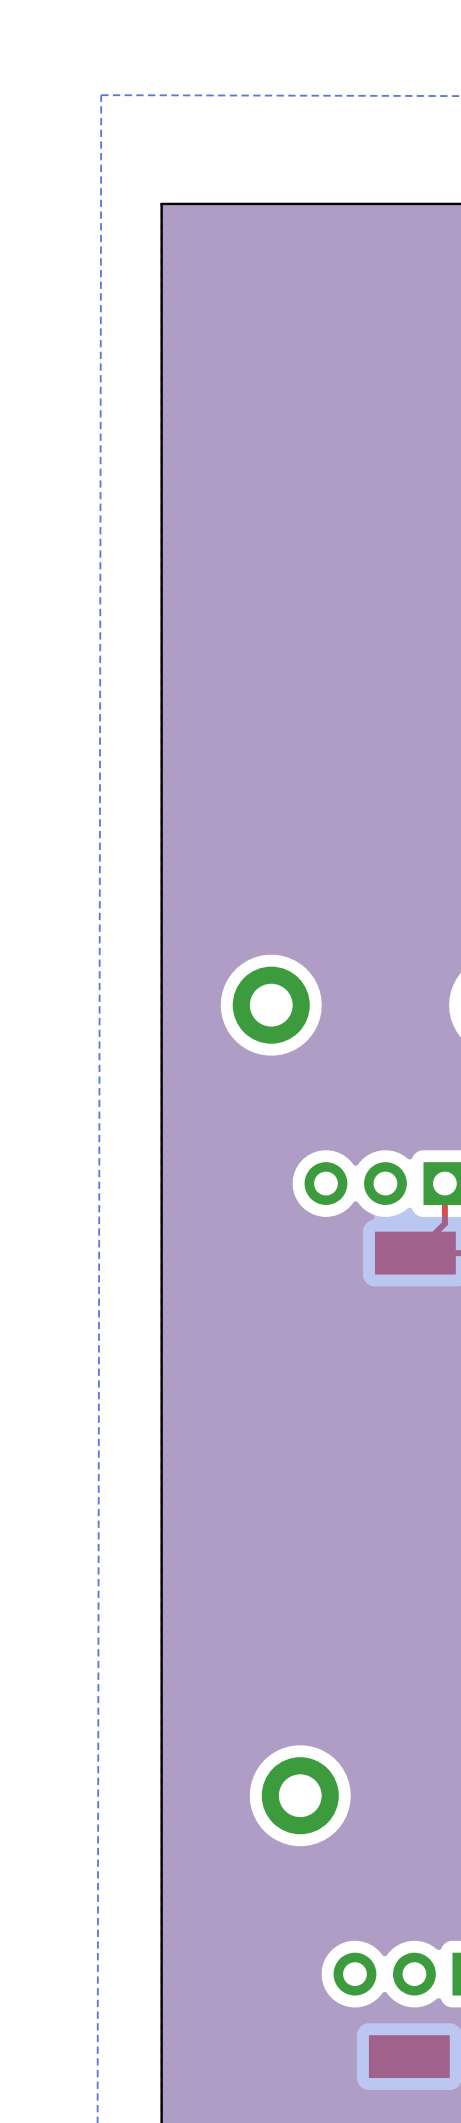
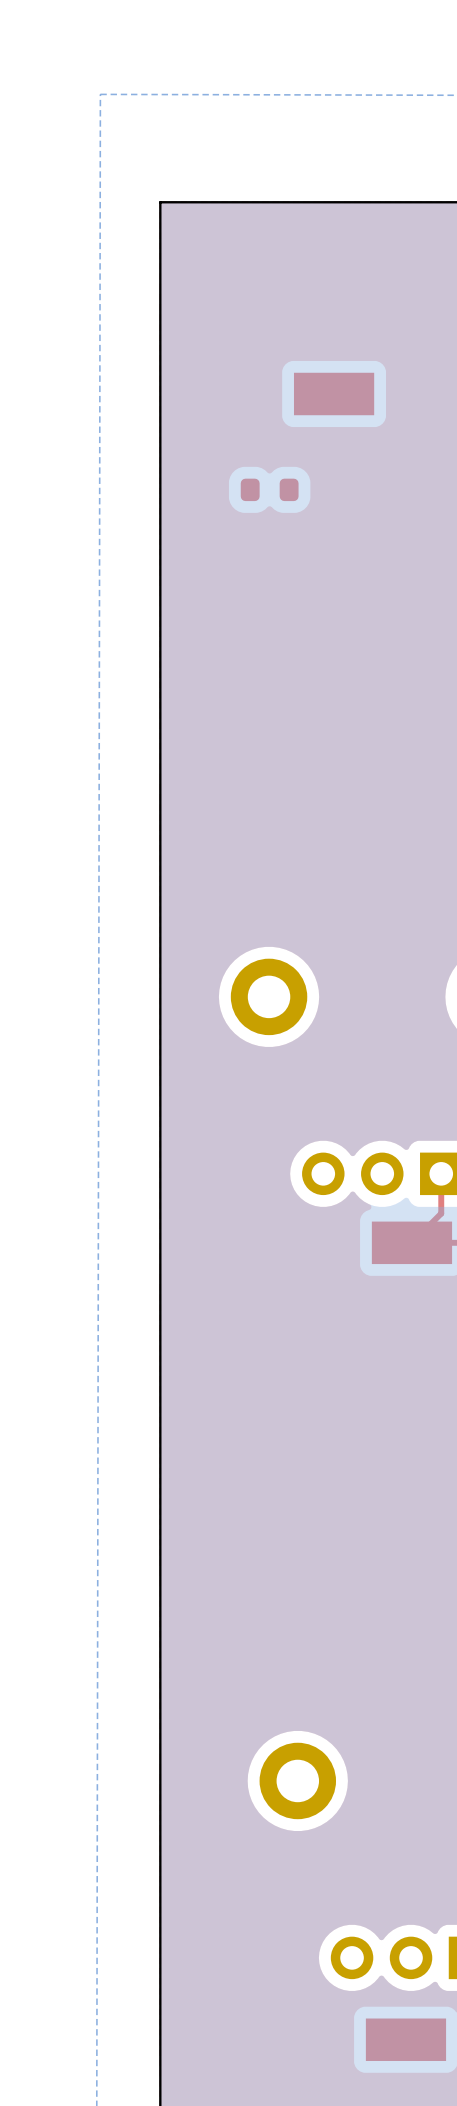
part: none -> (334, 393)
part: none -> (269, 489)

